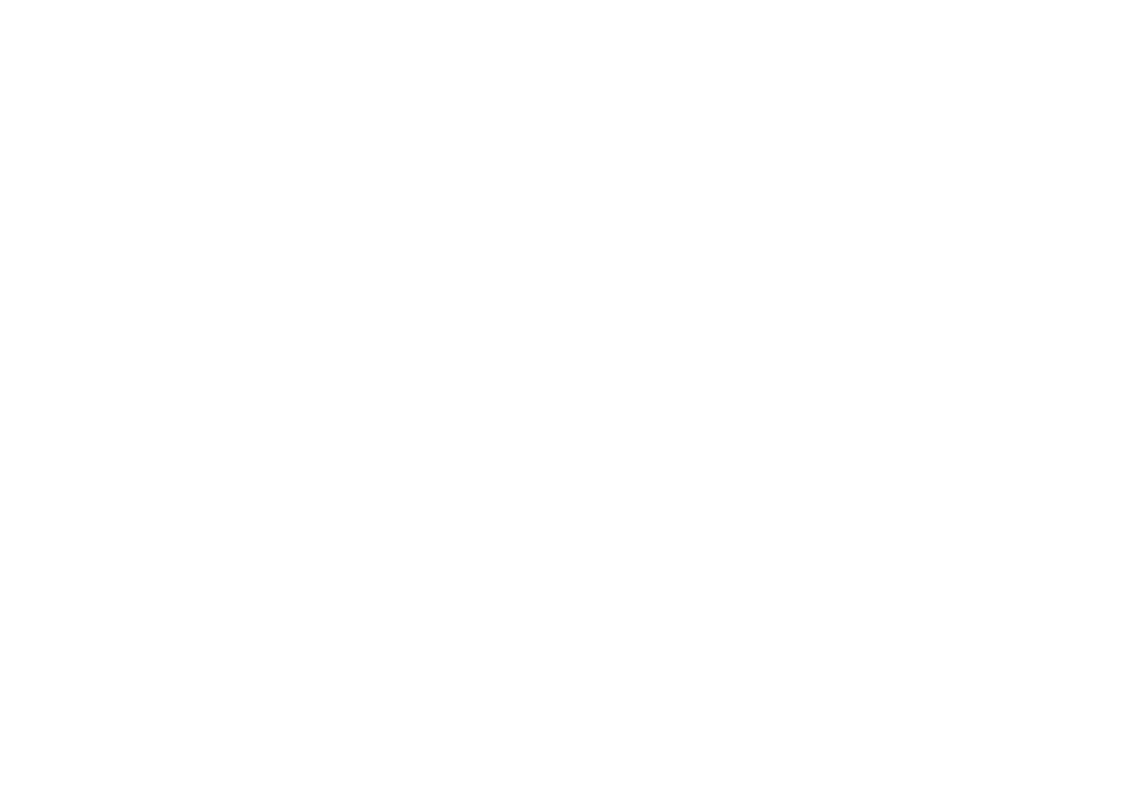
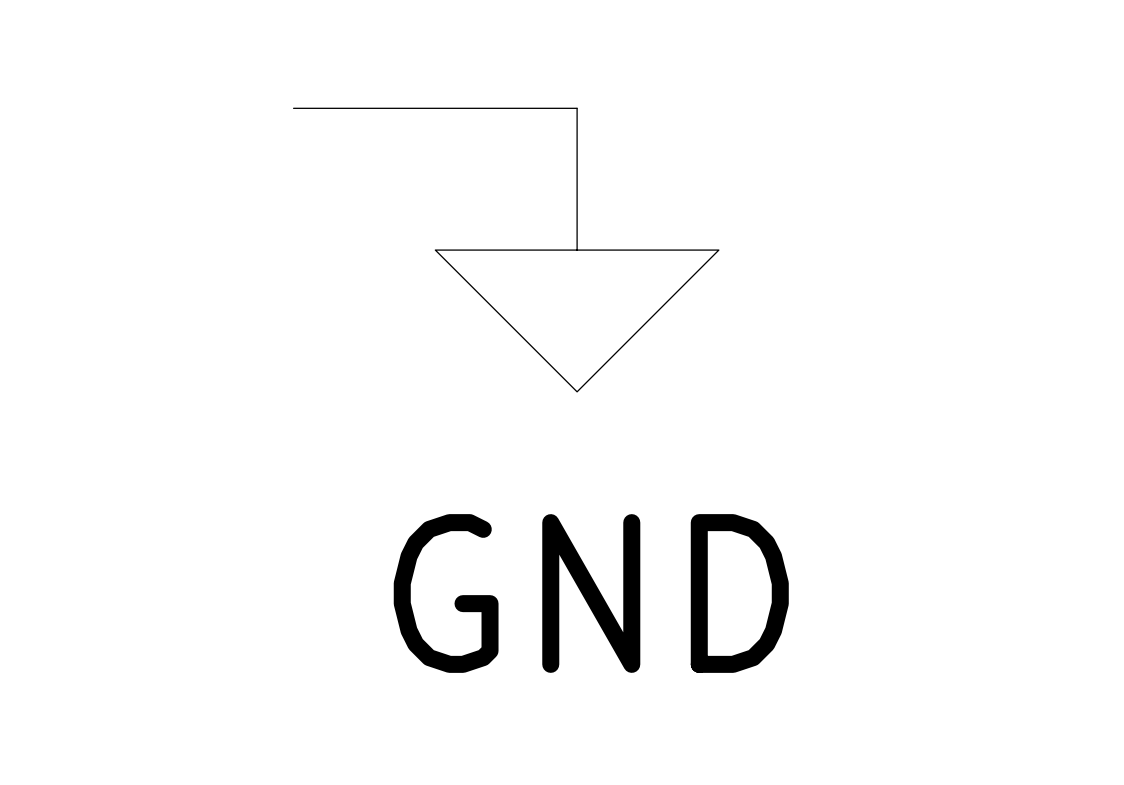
wire: none -> (293, 108) (577, 108)
power symbol: none -> GND (577, 250)

